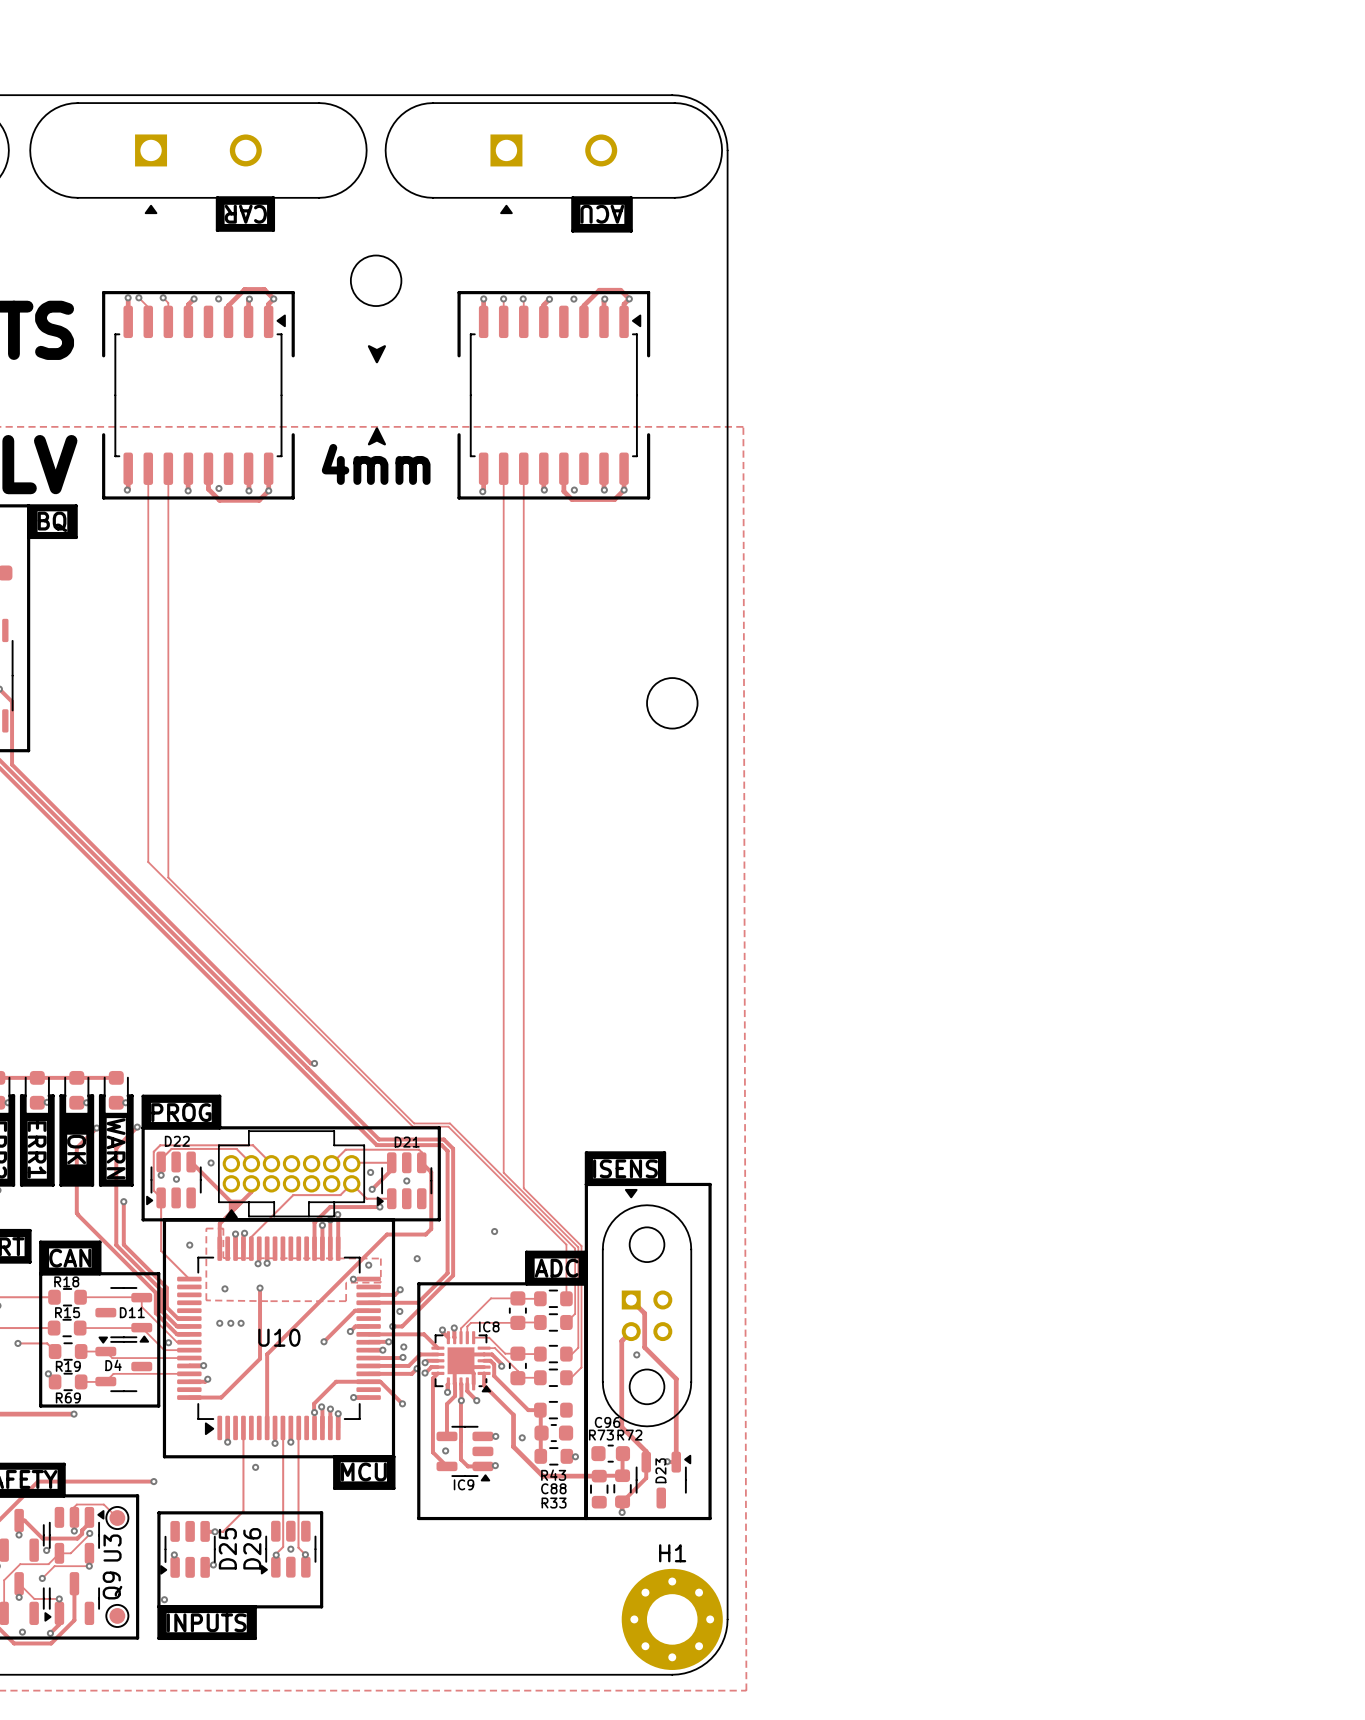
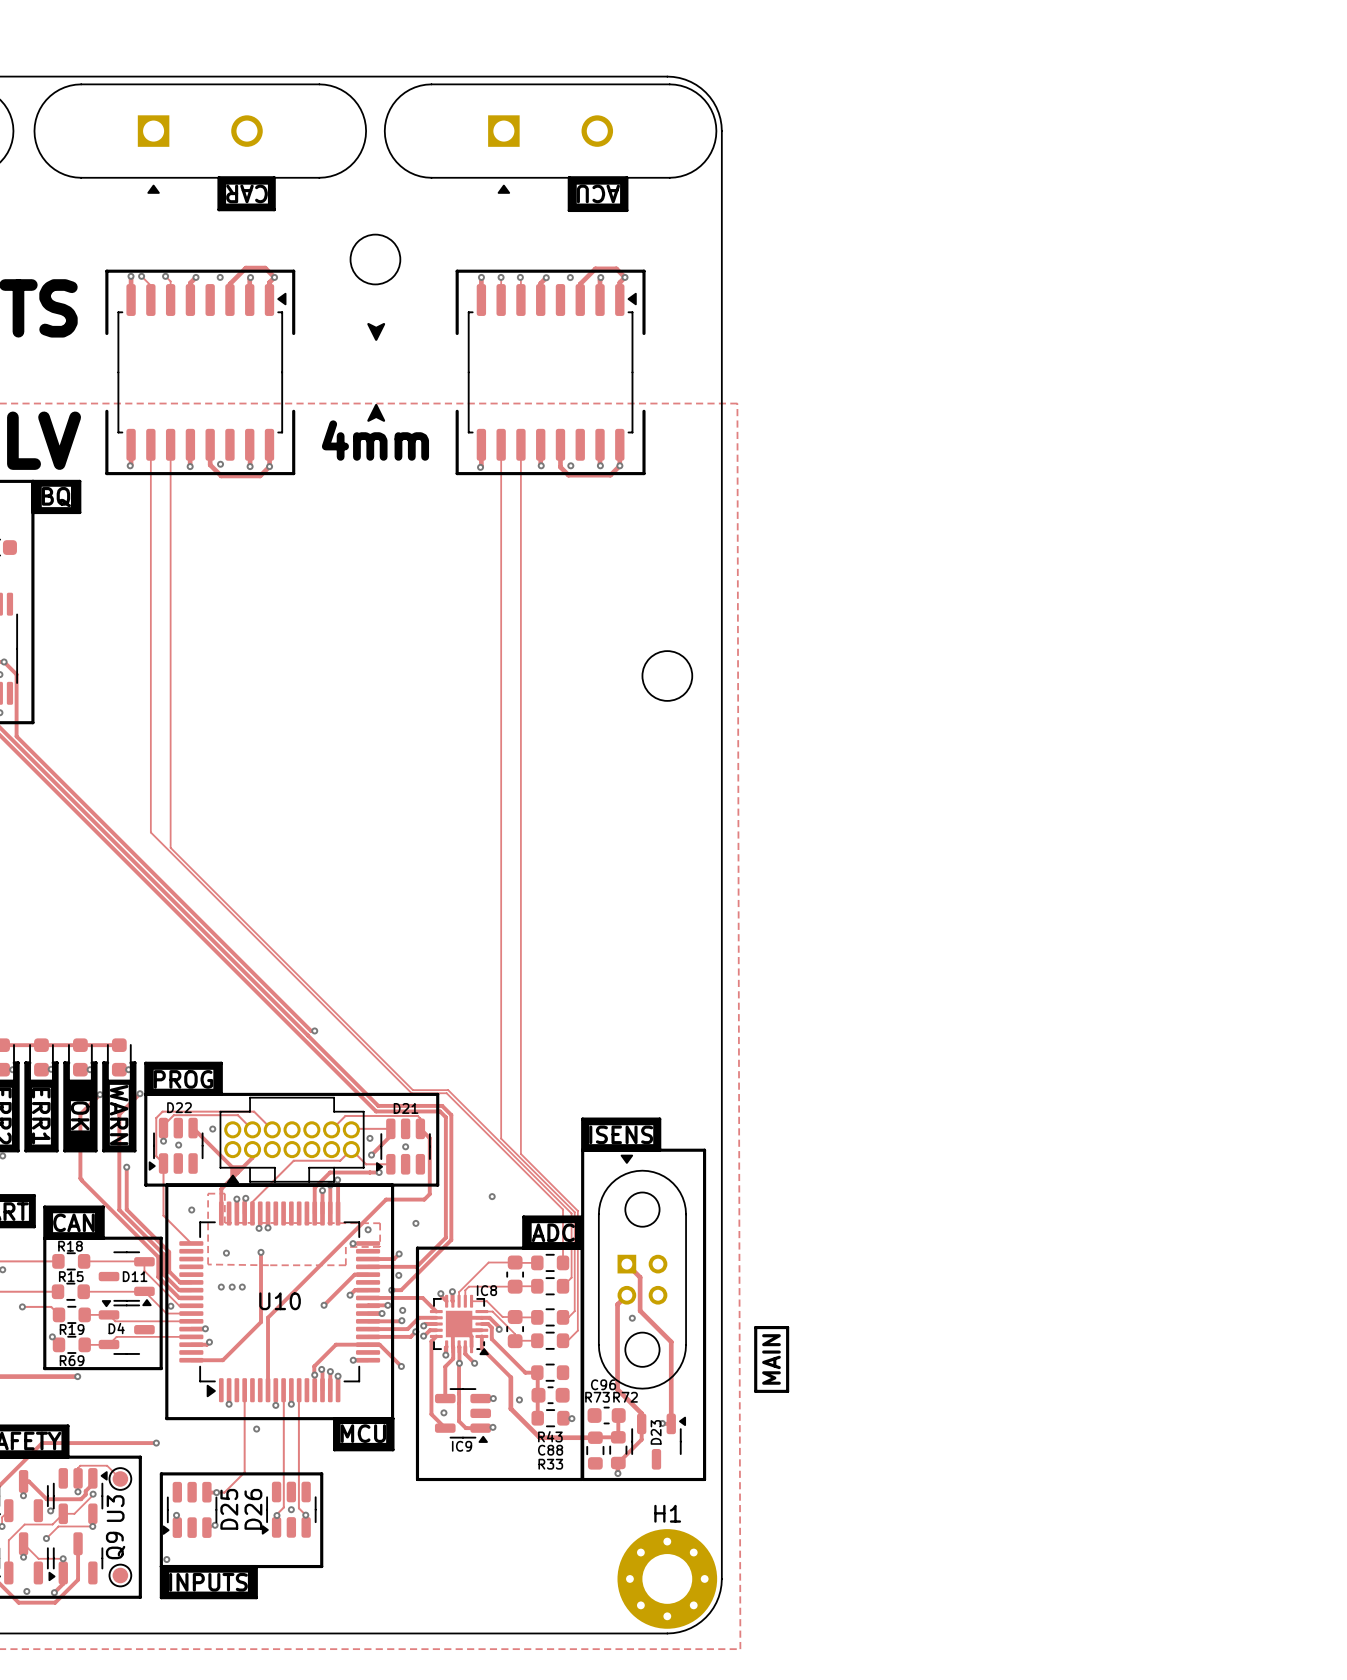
line: none -> (755, 1327) (787, 1327) (787, 1391) (755, 1391) (755, 1327)
text: none -> MAIN (771, 1359)

